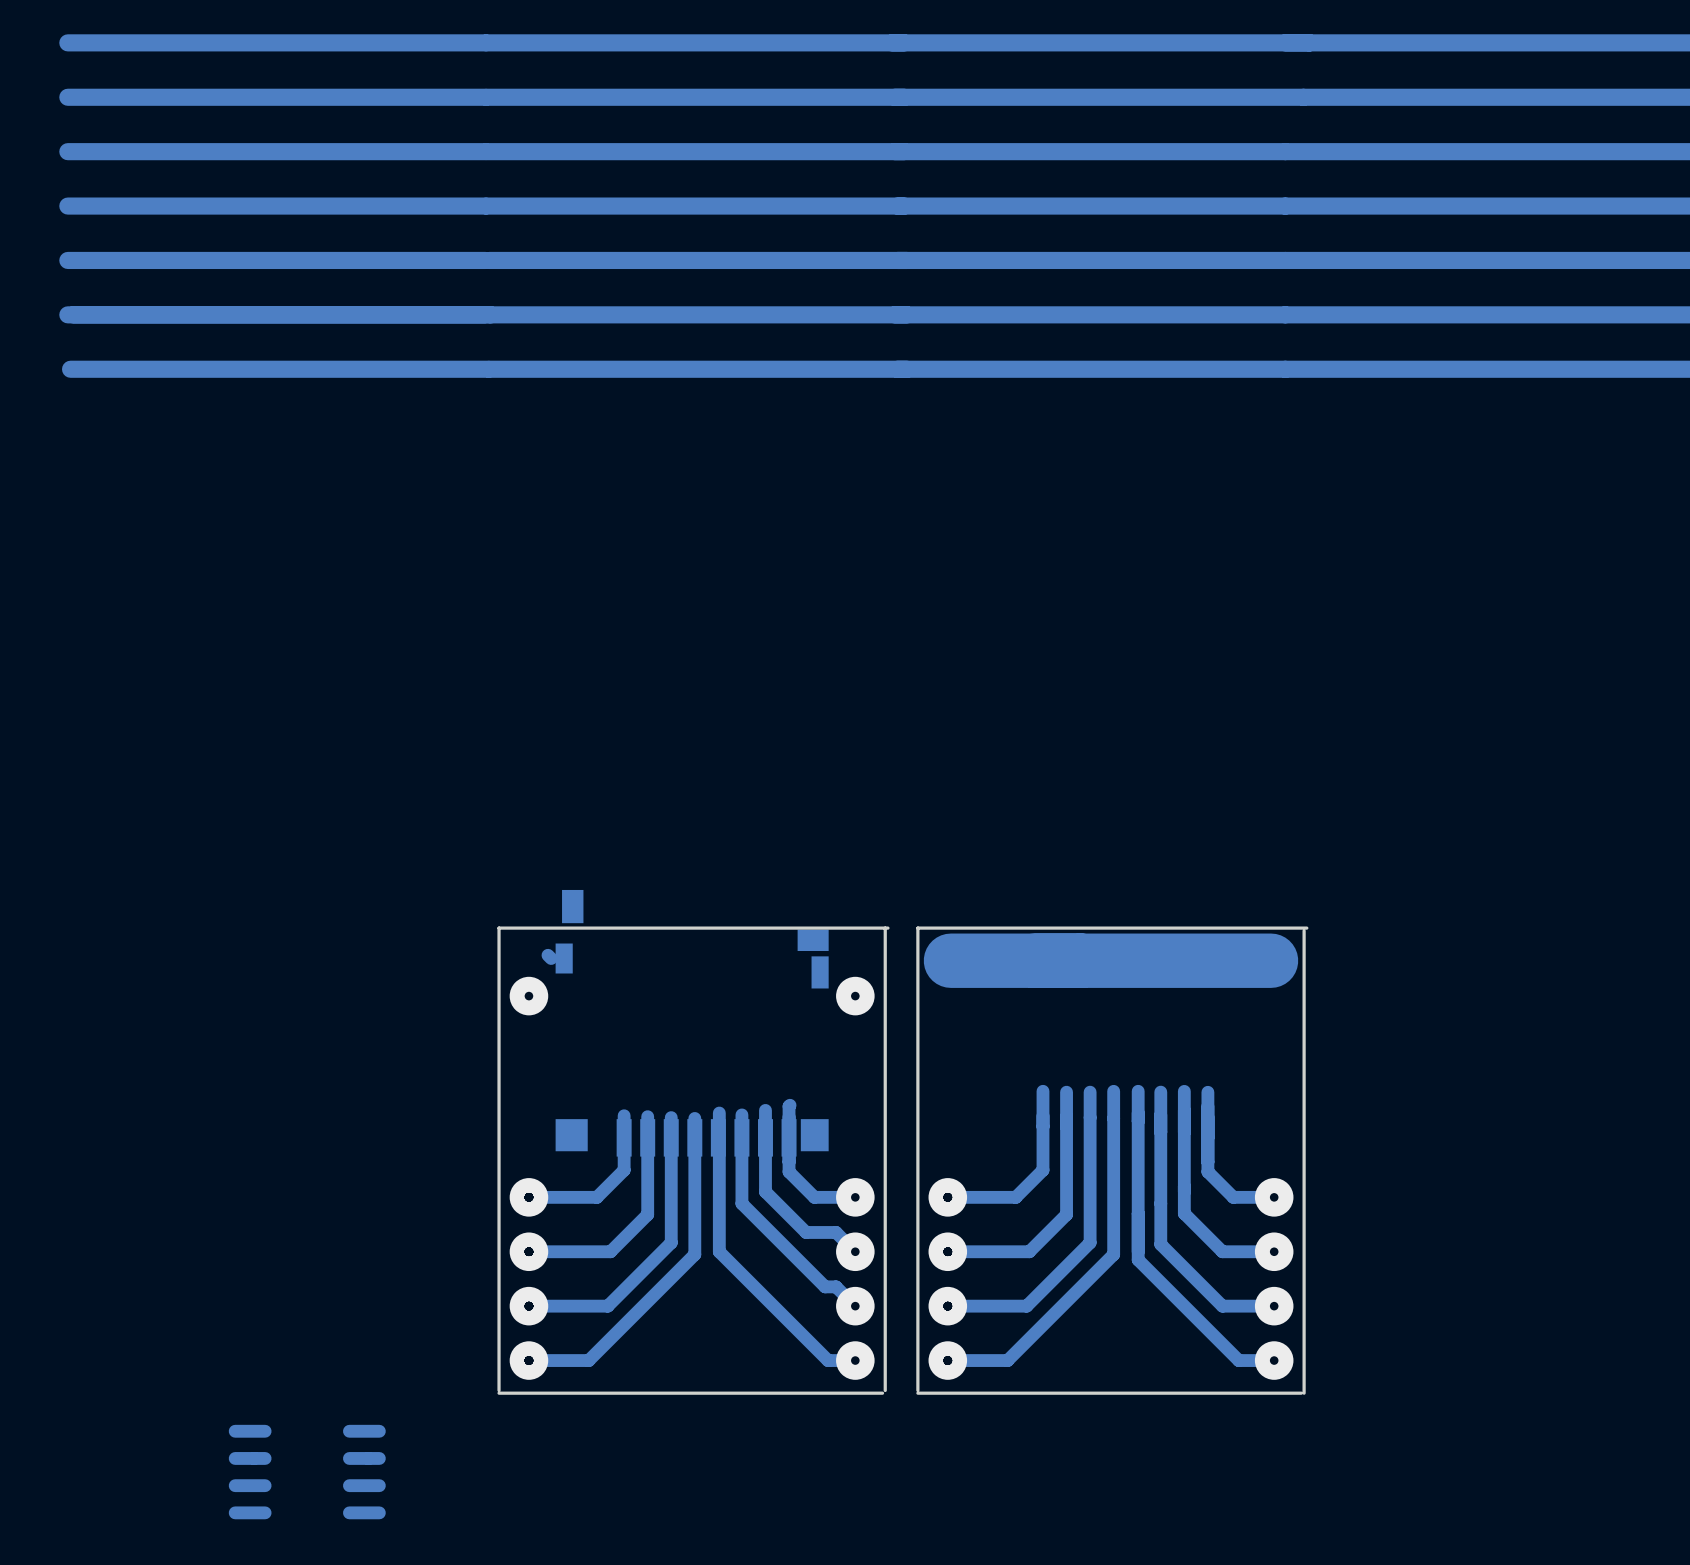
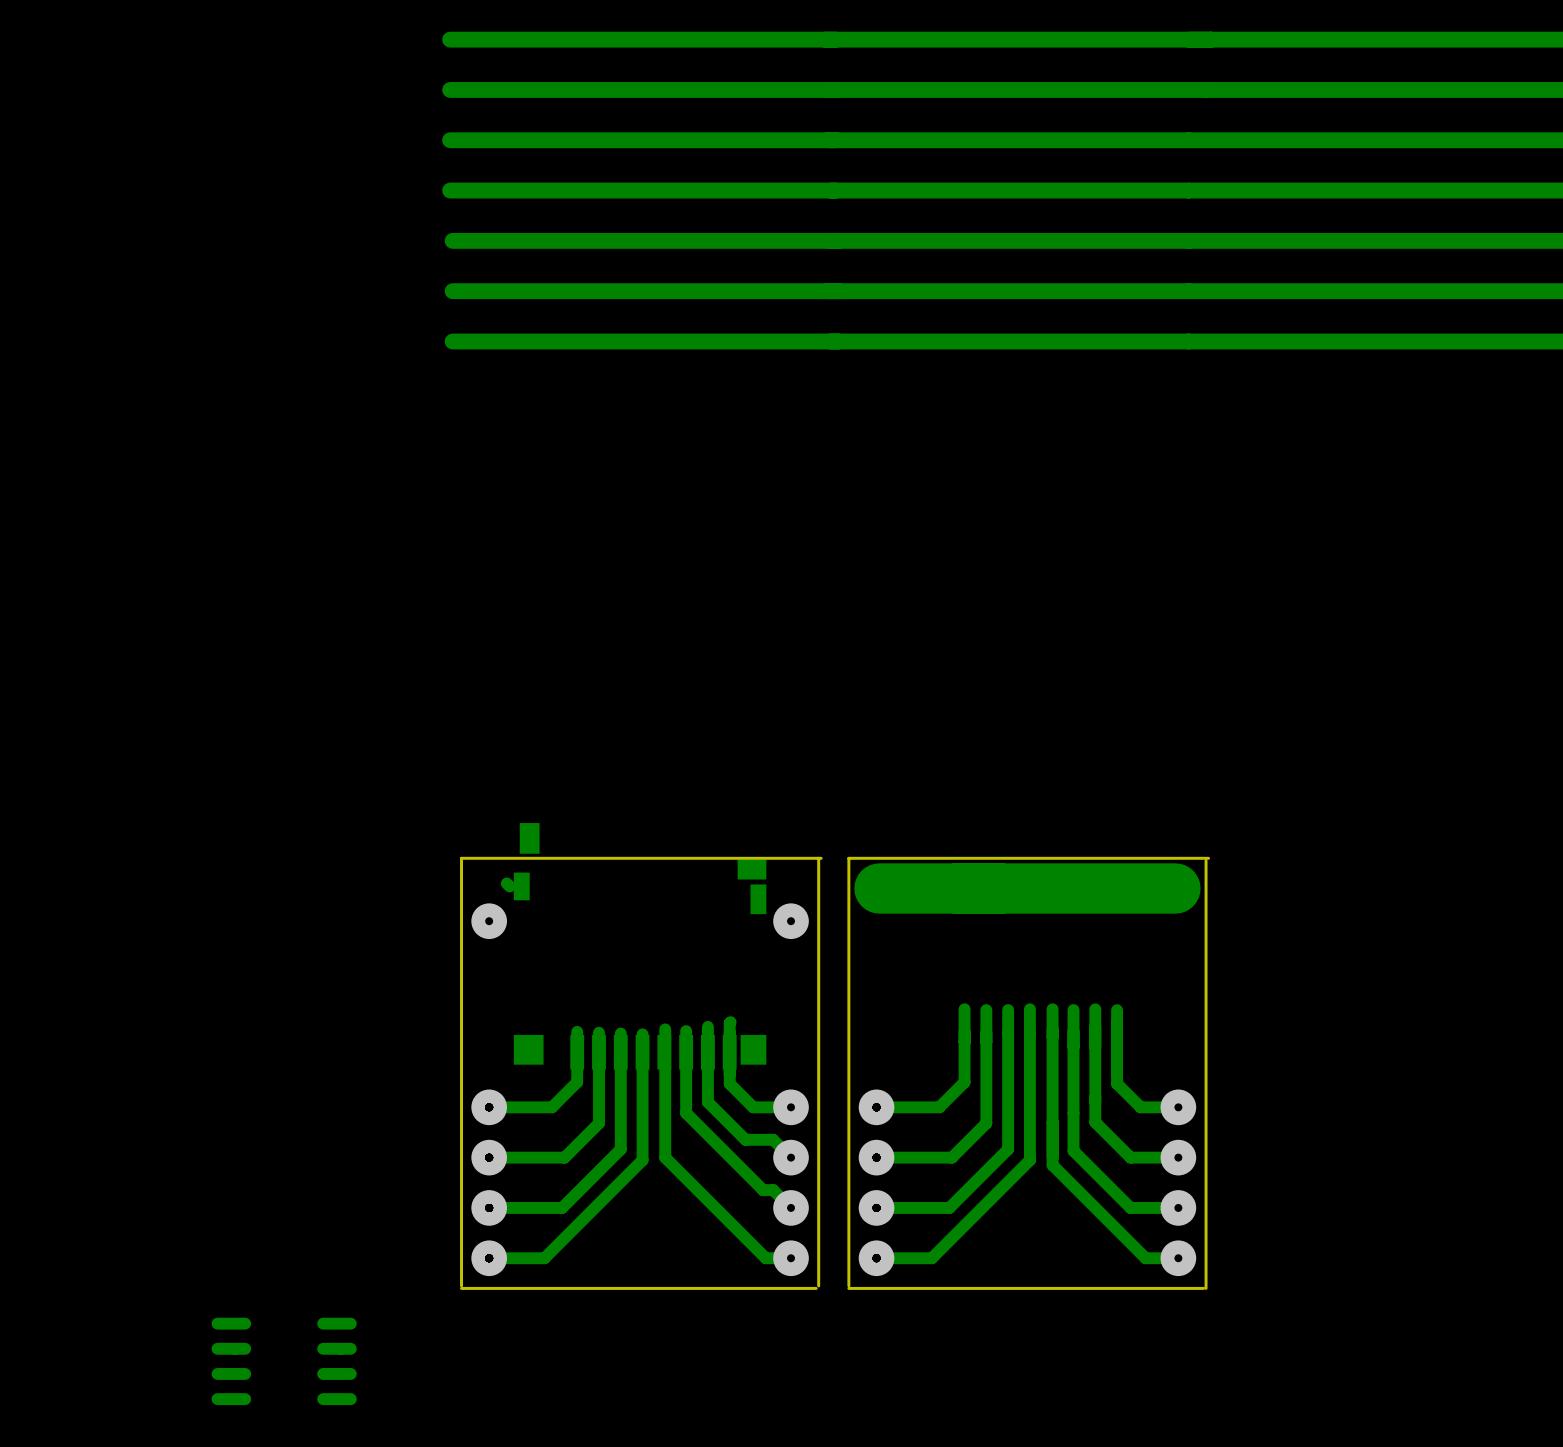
bottom track: (67, 42) (485, 42) -> none
bottom track: (67, 97) (485, 97) -> none
bottom track: (67, 151) (485, 151) -> none
bottom track: (67, 206) (485, 206) -> none
bottom track: (67, 260) (485, 260) -> none
bottom track: (67, 314) (489, 314) -> none
bottom track: (70, 369) (488, 369) -> none

